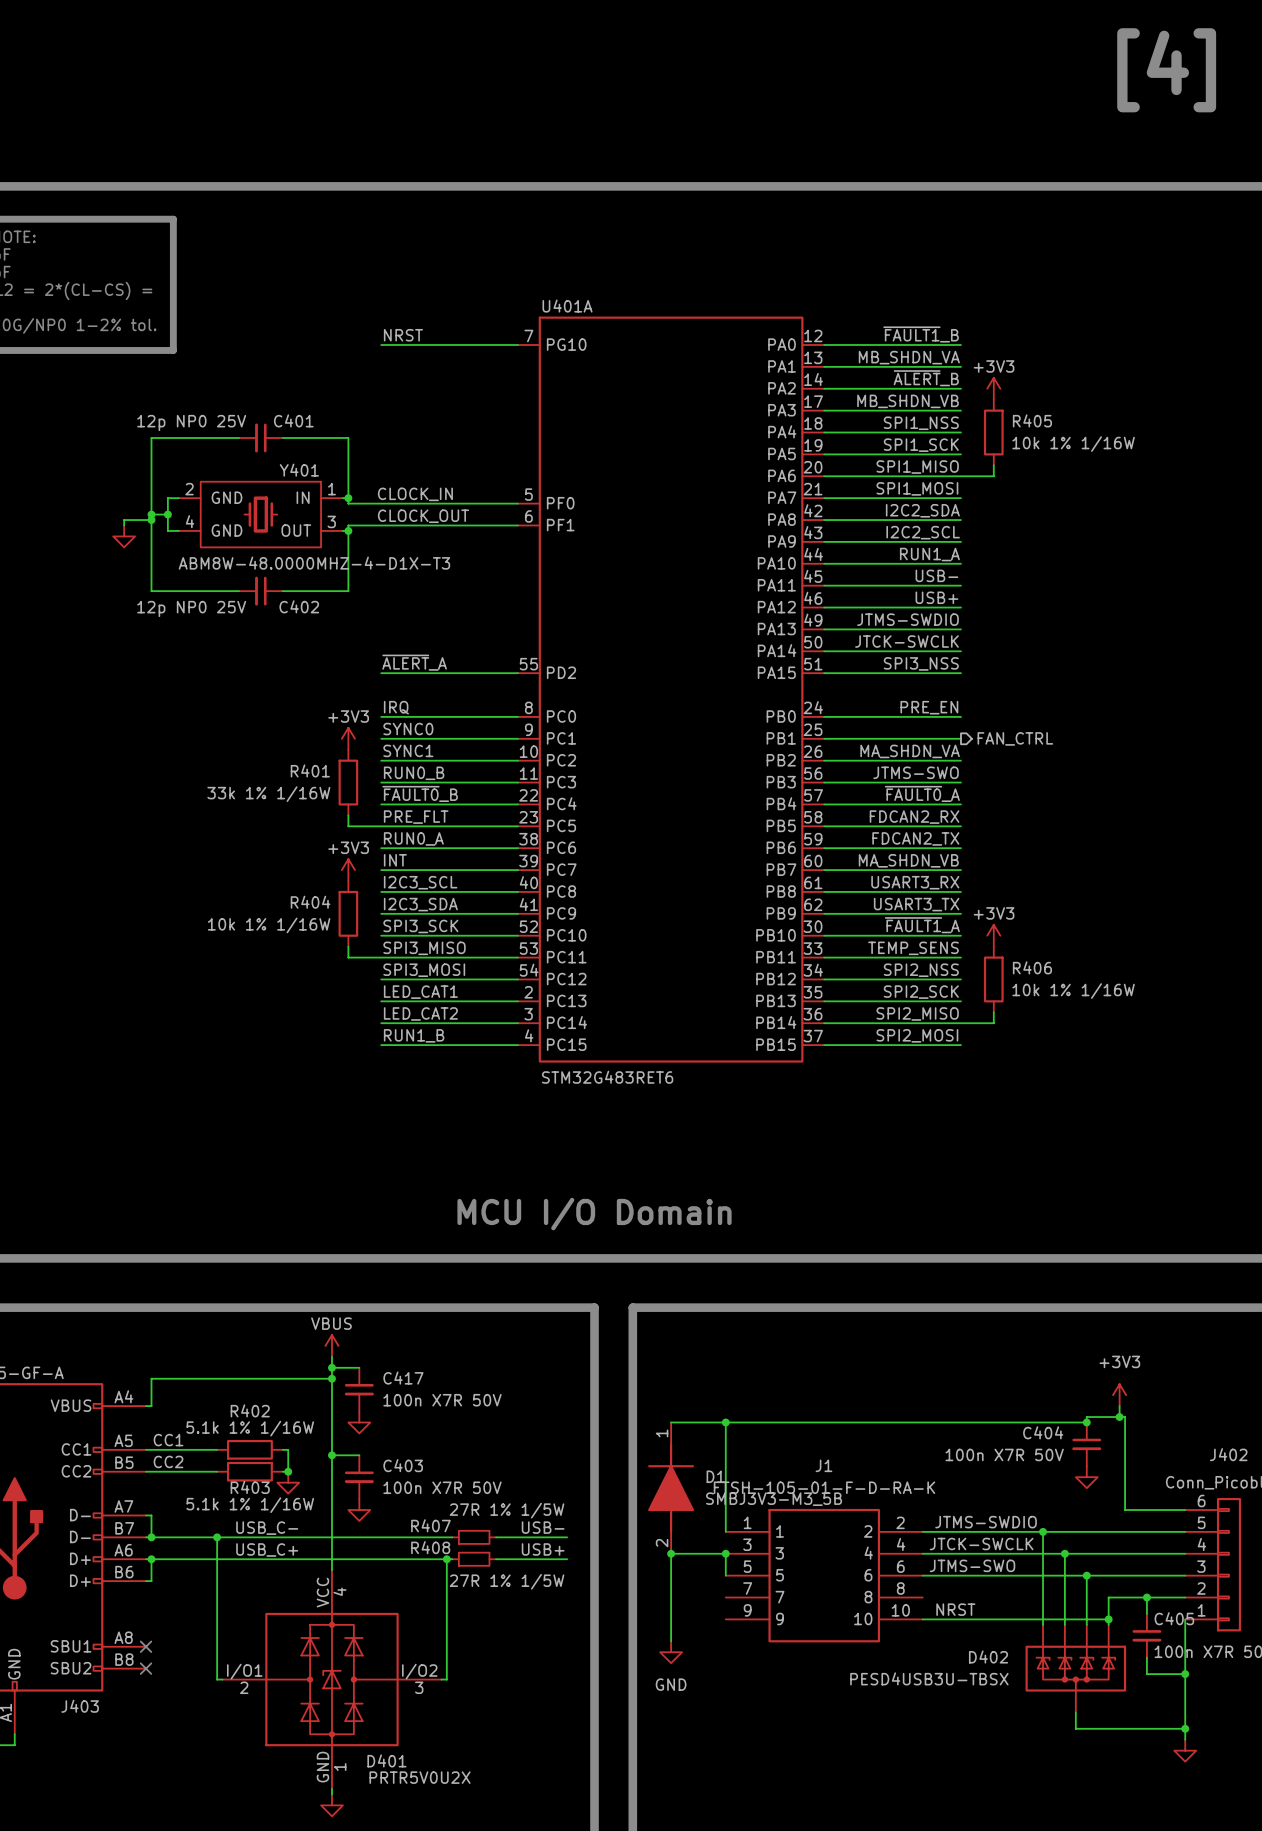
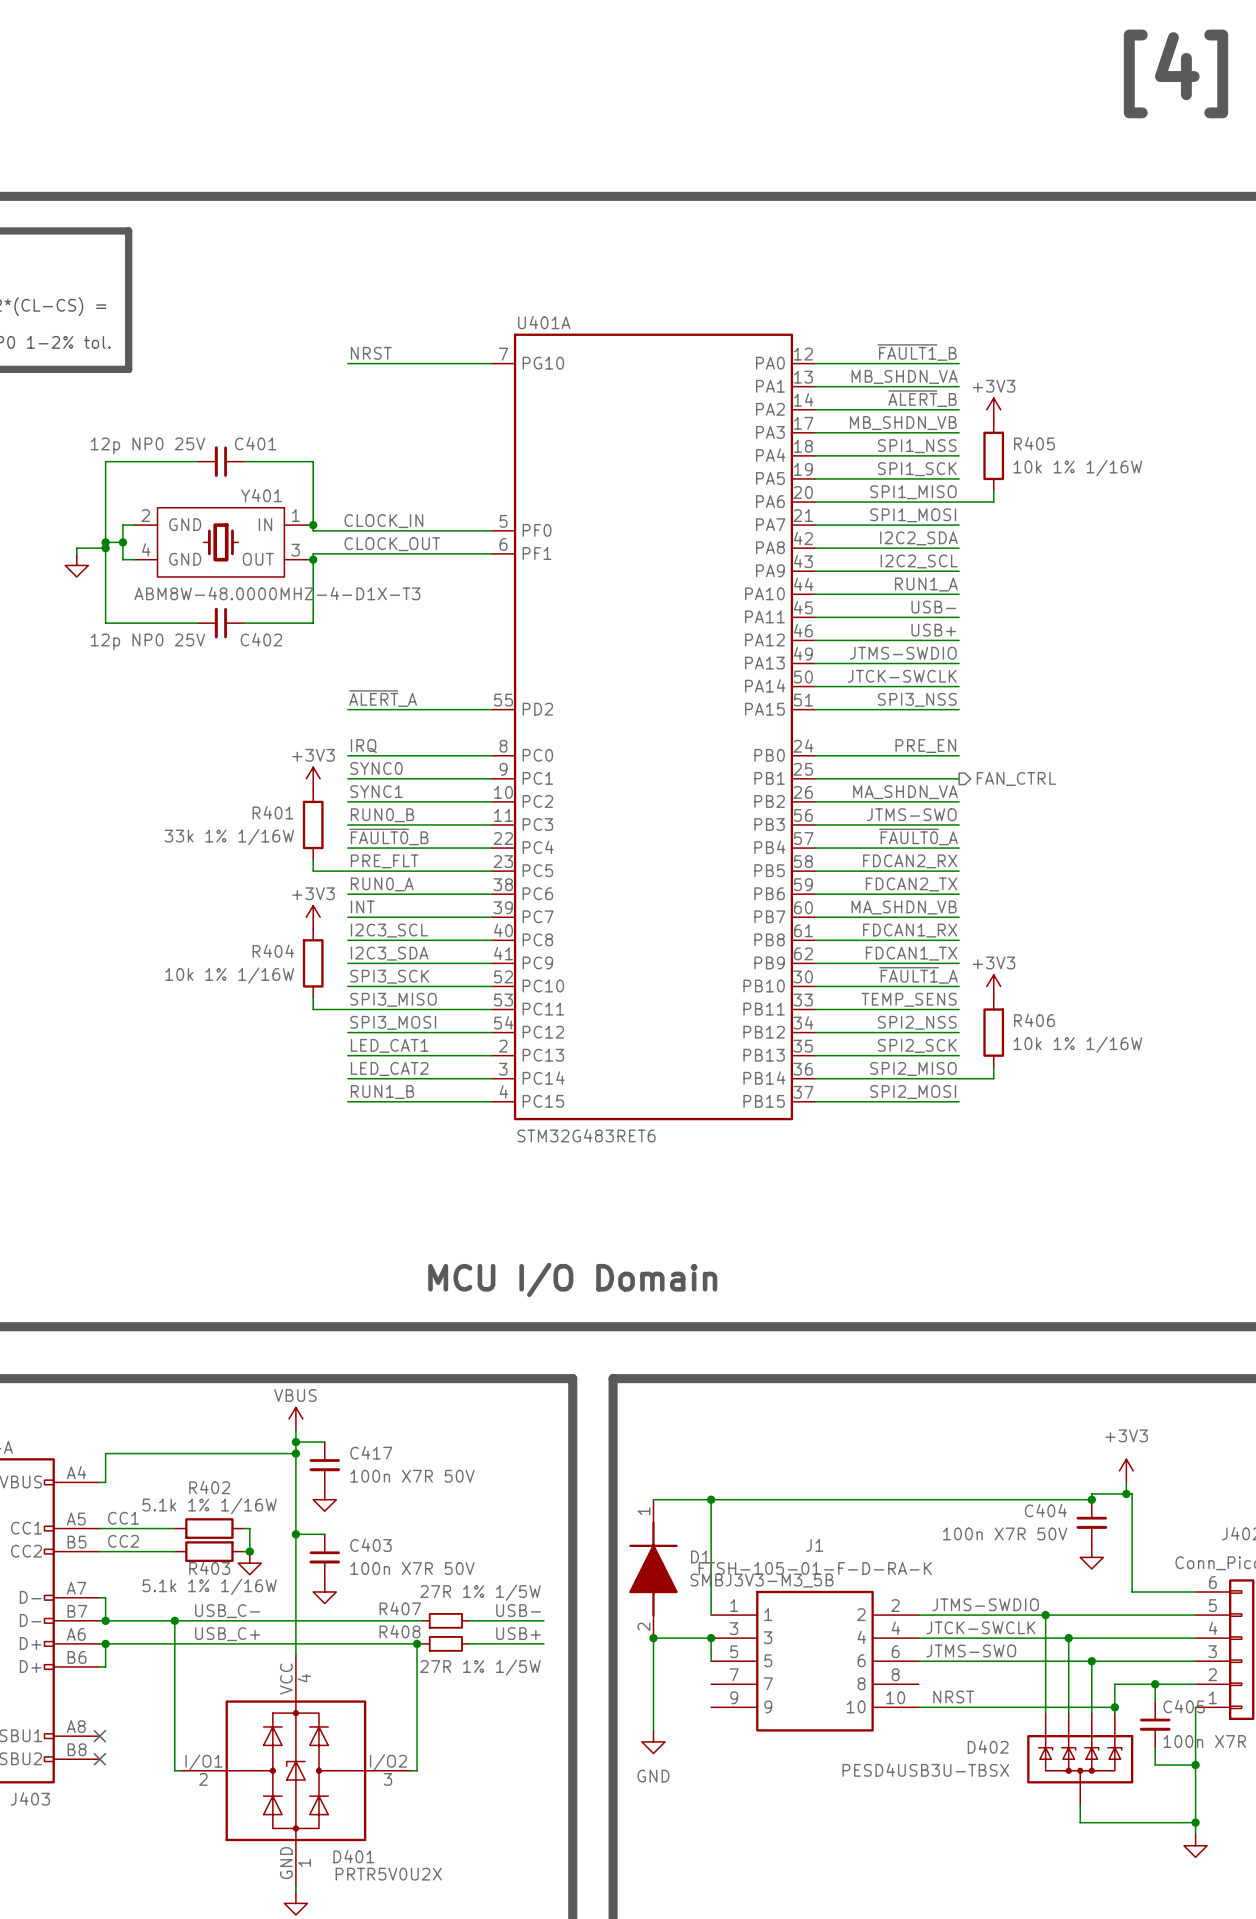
label: USART3_RX (915, 882) -> FDCAN1_RX (910, 930)
label: USART3_TX (916, 904) -> FDCAN1_TX (911, 953)

